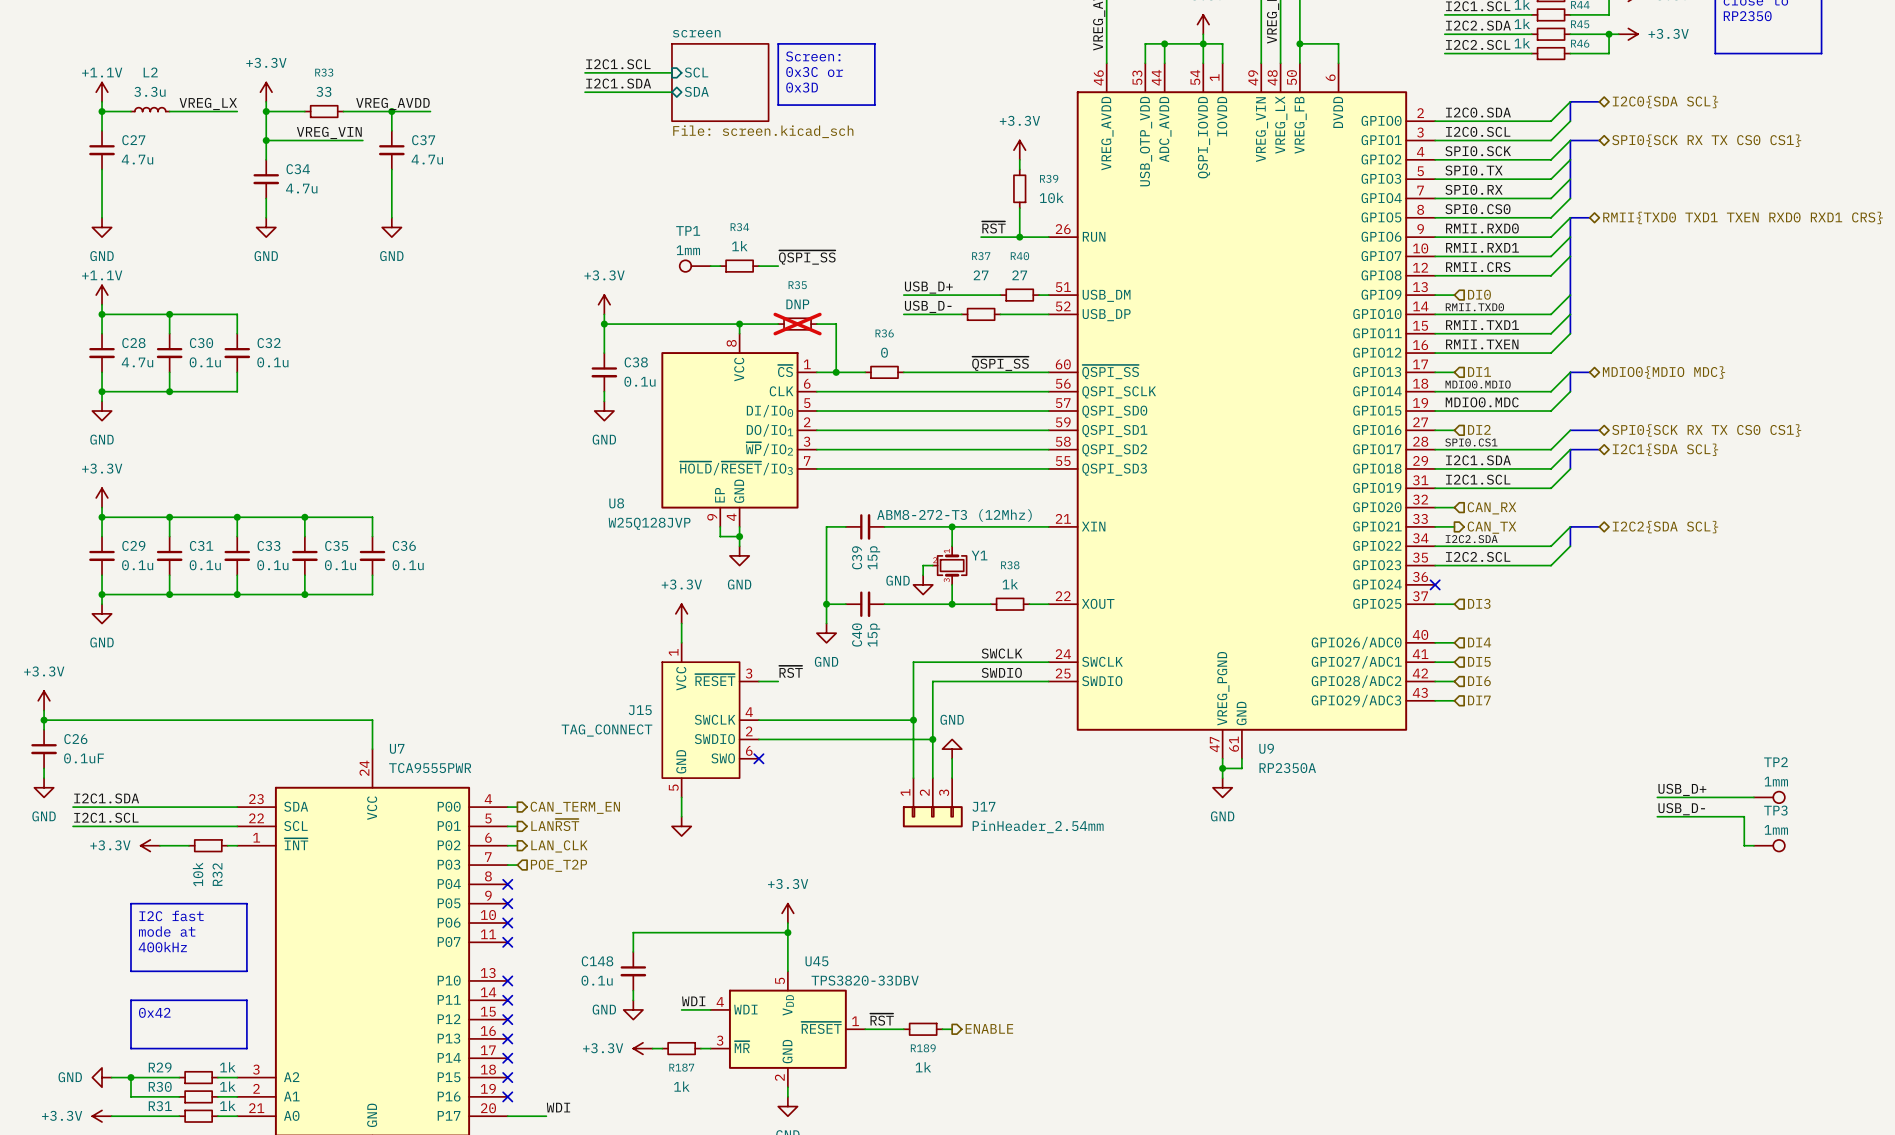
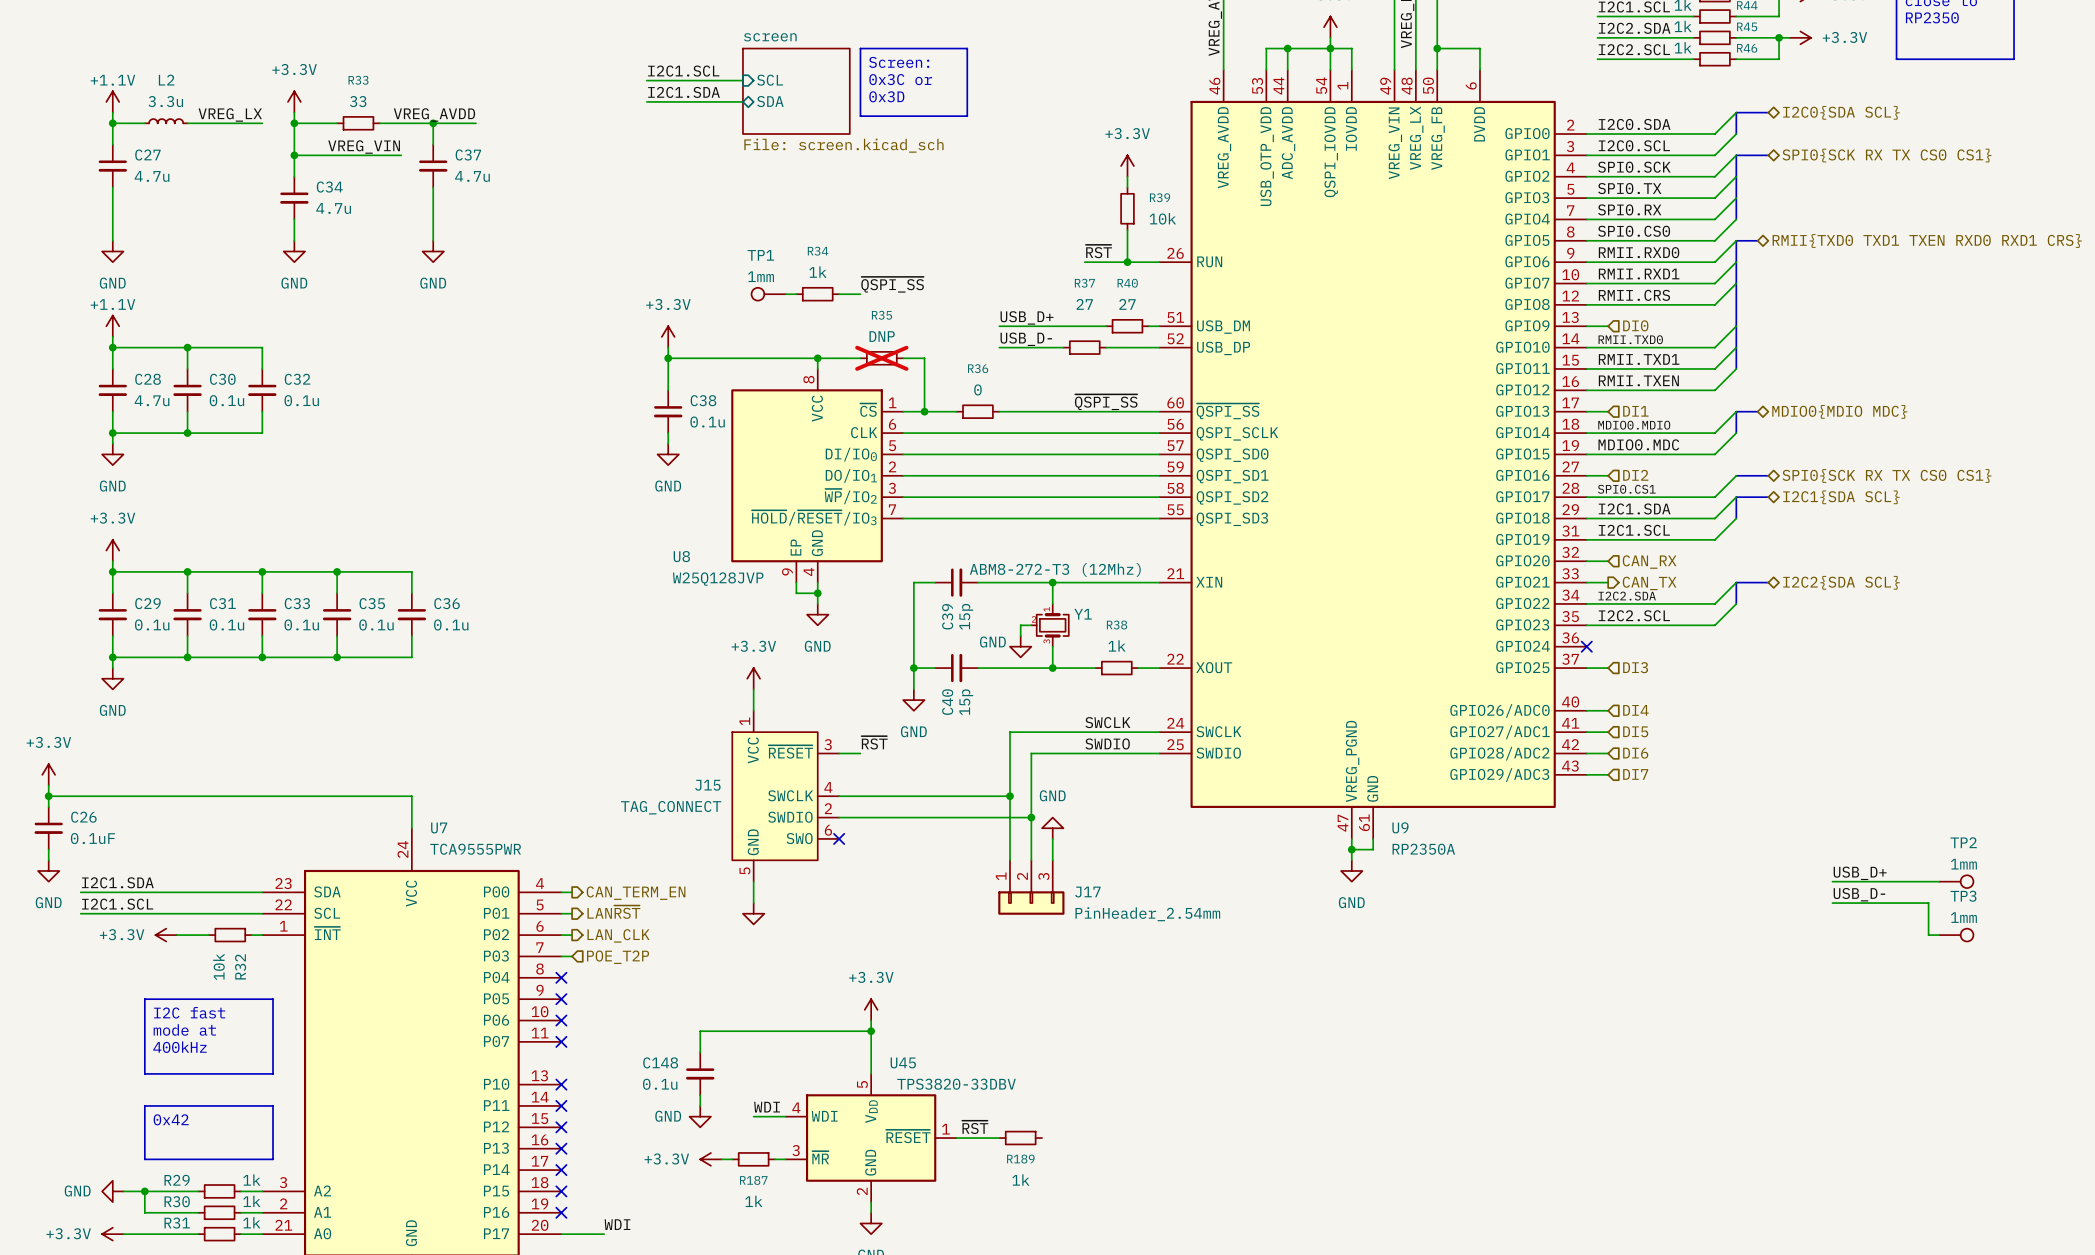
hierarchical label: ENABLE (989, 1028) -> none
wire: (942, 1029) (952, 1029) -> none

